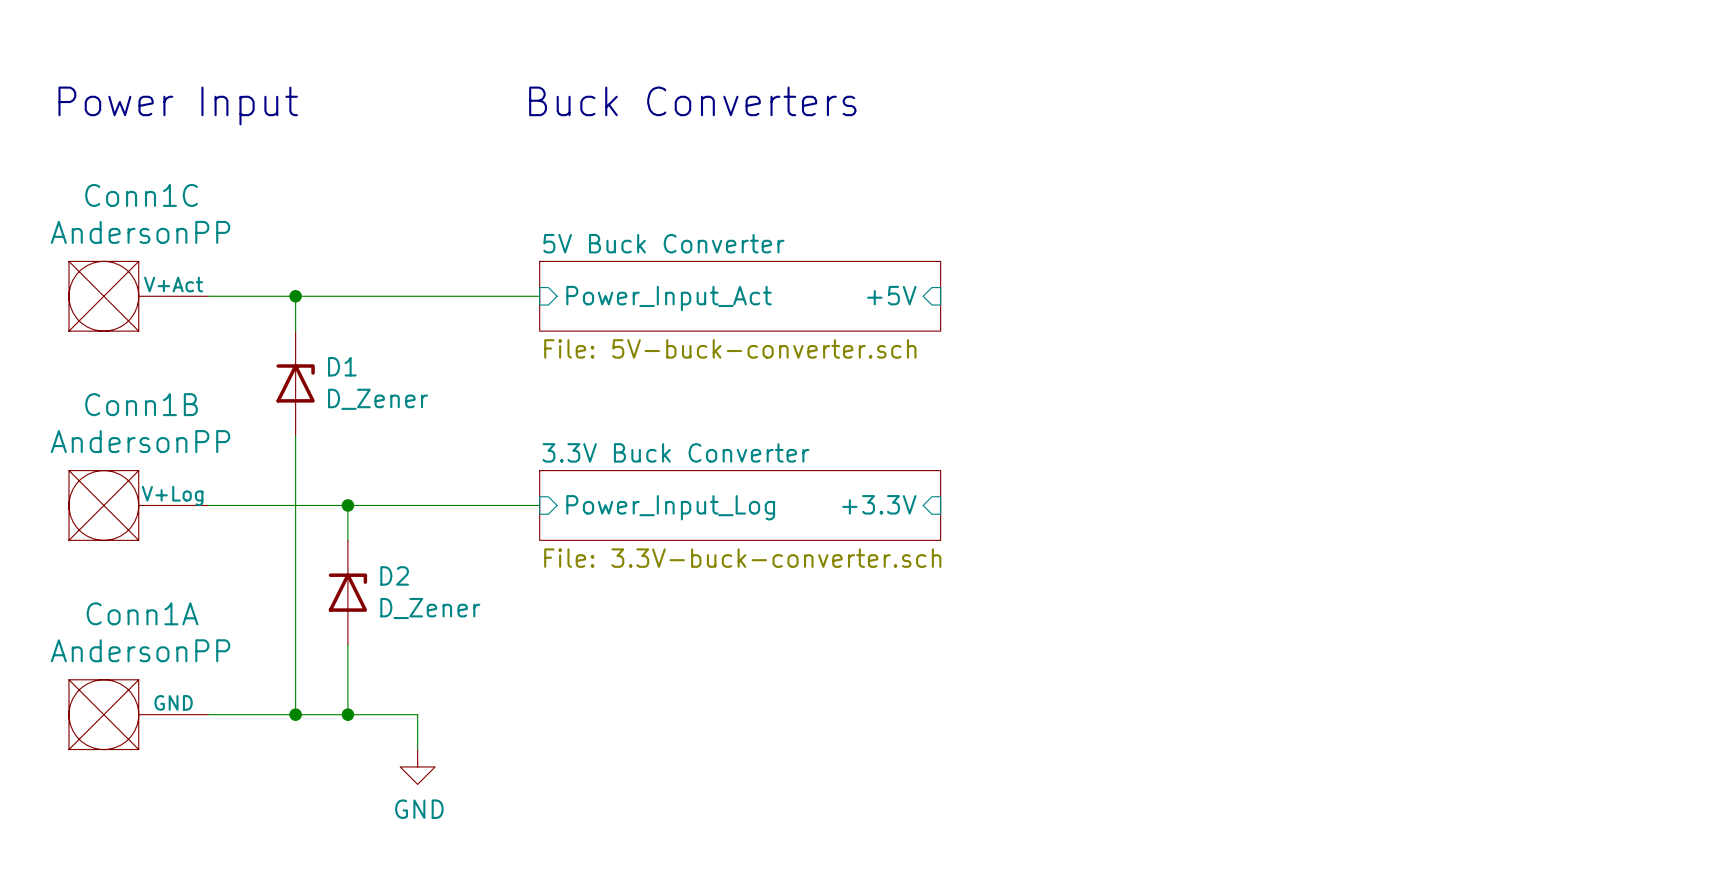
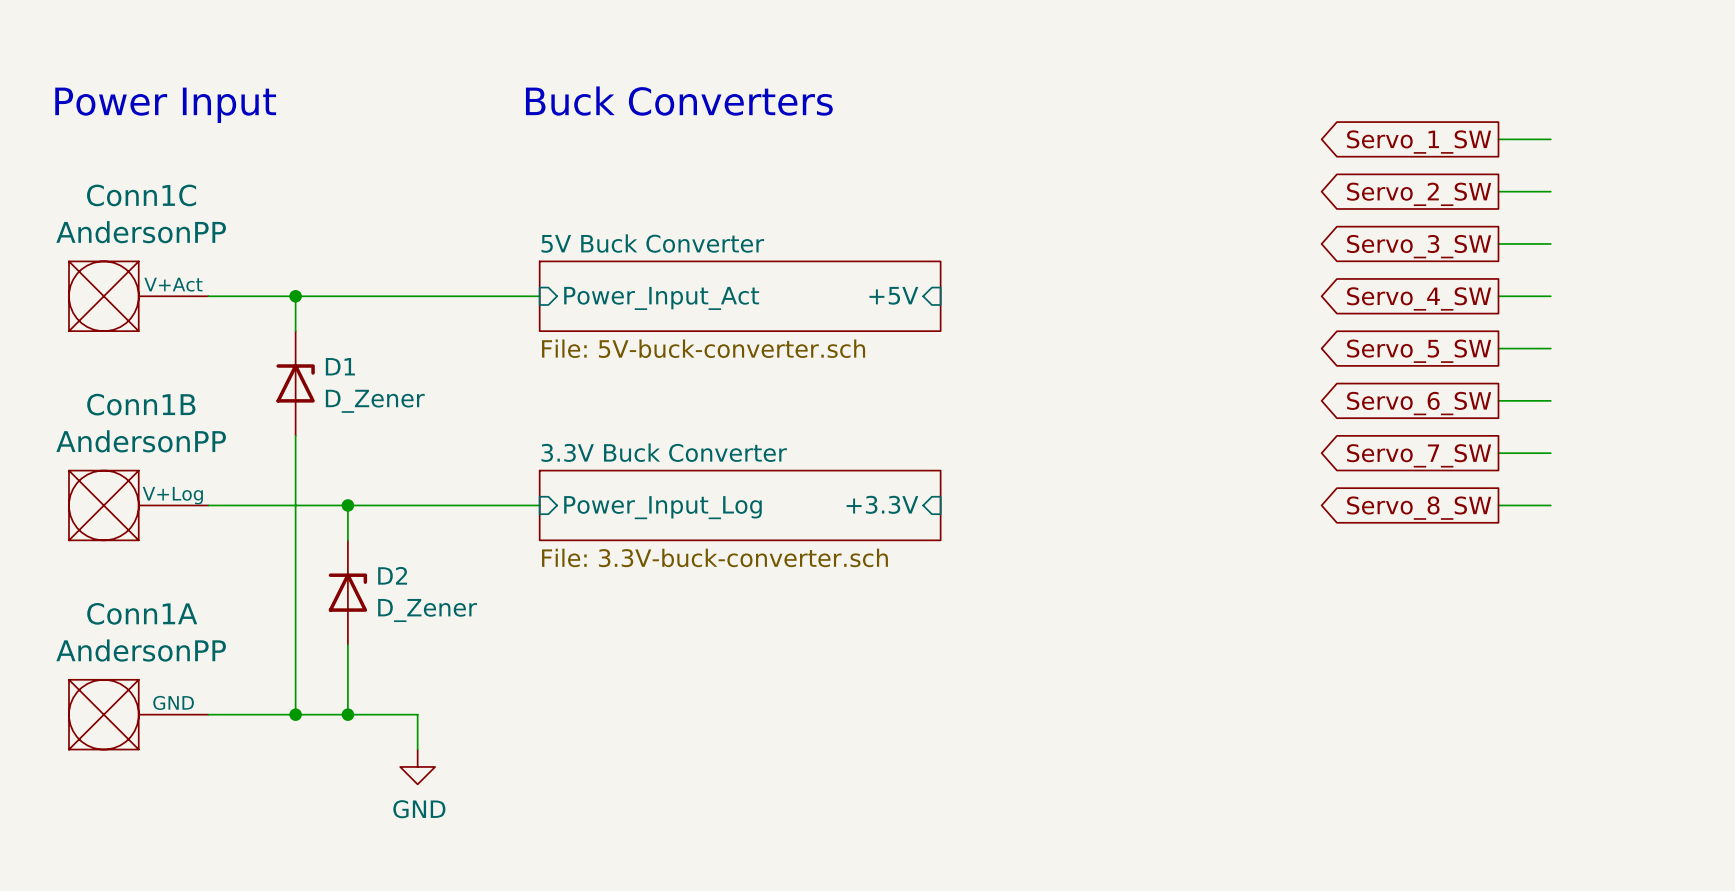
wire: none -> (1498, 139) (1550, 139)
global label: none -> Servo_1_SW (1419, 142)
wire: none -> (1498, 191) (1550, 191)
global label: none -> Servo_2_SW (1419, 194)
wire: none -> (1498, 243) (1550, 243)
global label: none -> Servo_3_SW (1419, 246)
global label: none -> Servo_4_SW (1419, 298)
wire: none -> (1498, 296) (1550, 296)
wire: none -> (1498, 348) (1550, 348)
global label: none -> Servo_5_SW (1419, 351)
wire: none -> (1498, 400) (1550, 400)
global label: none -> Servo_6_SW (1419, 403)
wire: none -> (1498, 453) (1550, 453)
global label: none -> Servo_7_SW (1419, 455)
wire: none -> (1498, 505) (1550, 505)
global label: none -> Servo_8_SW (1419, 508)

